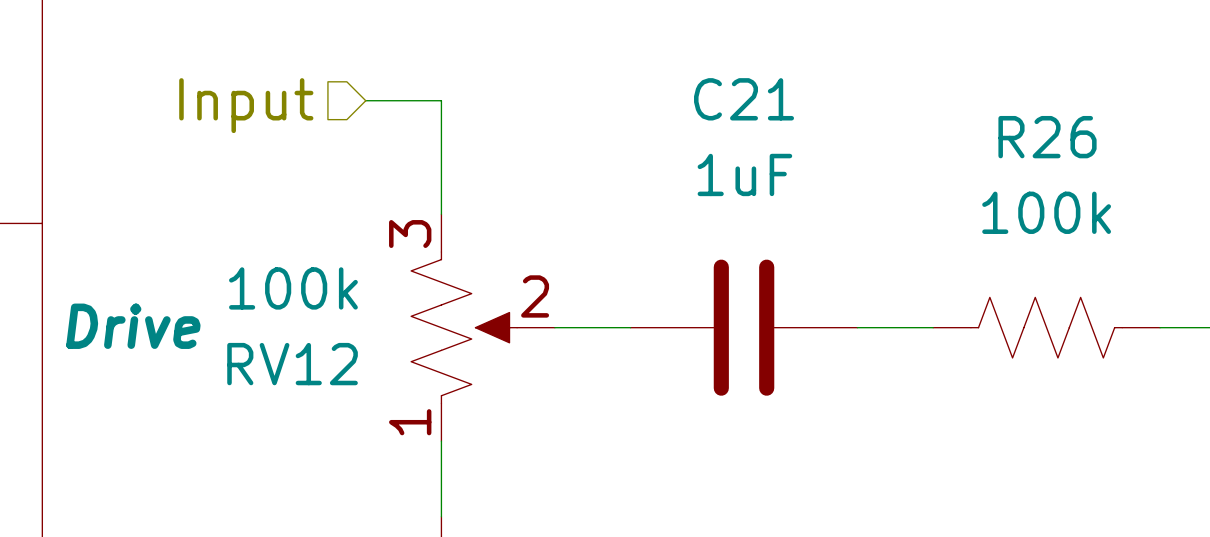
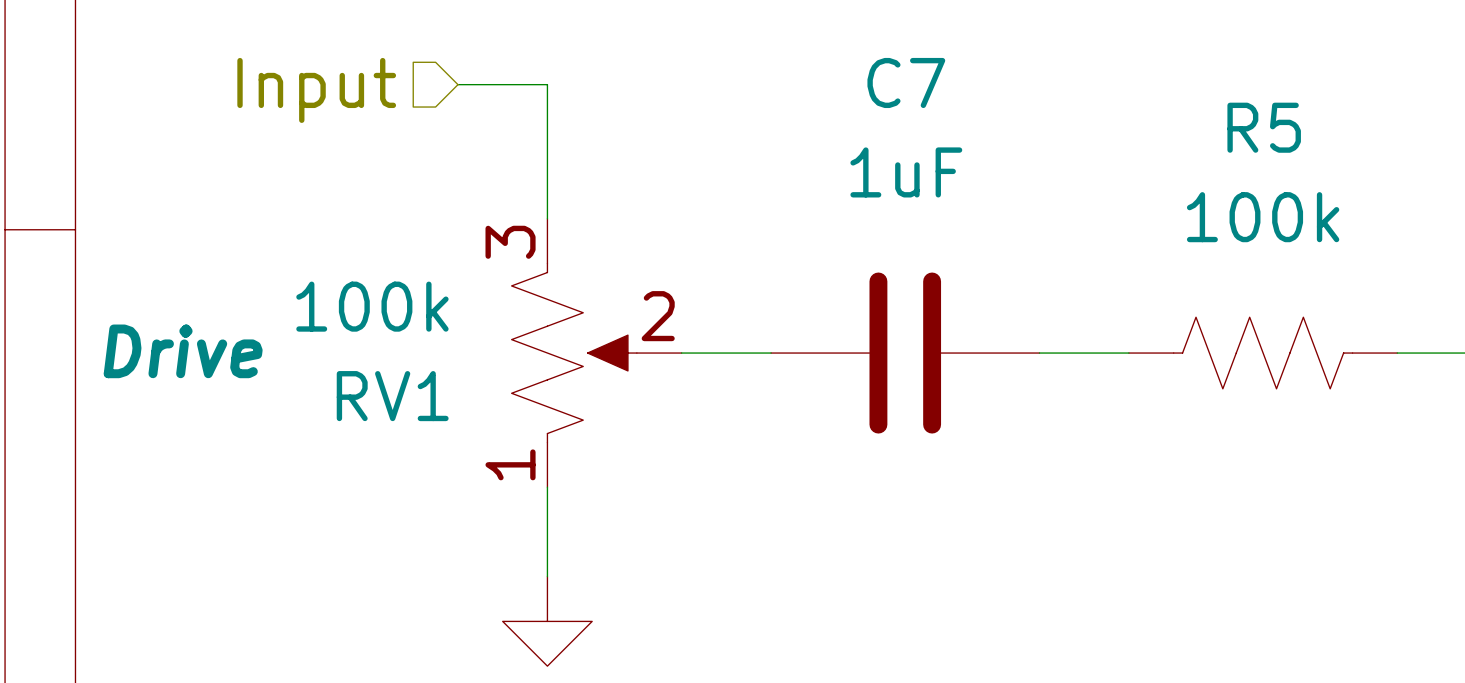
C21 name: C21 (744, 99) -> C7 (906, 82)
R26 name: R26 (1047, 137) -> R5 (1264, 127)
RV12 name: RV12 (292, 364) -> RV1 (392, 396)

